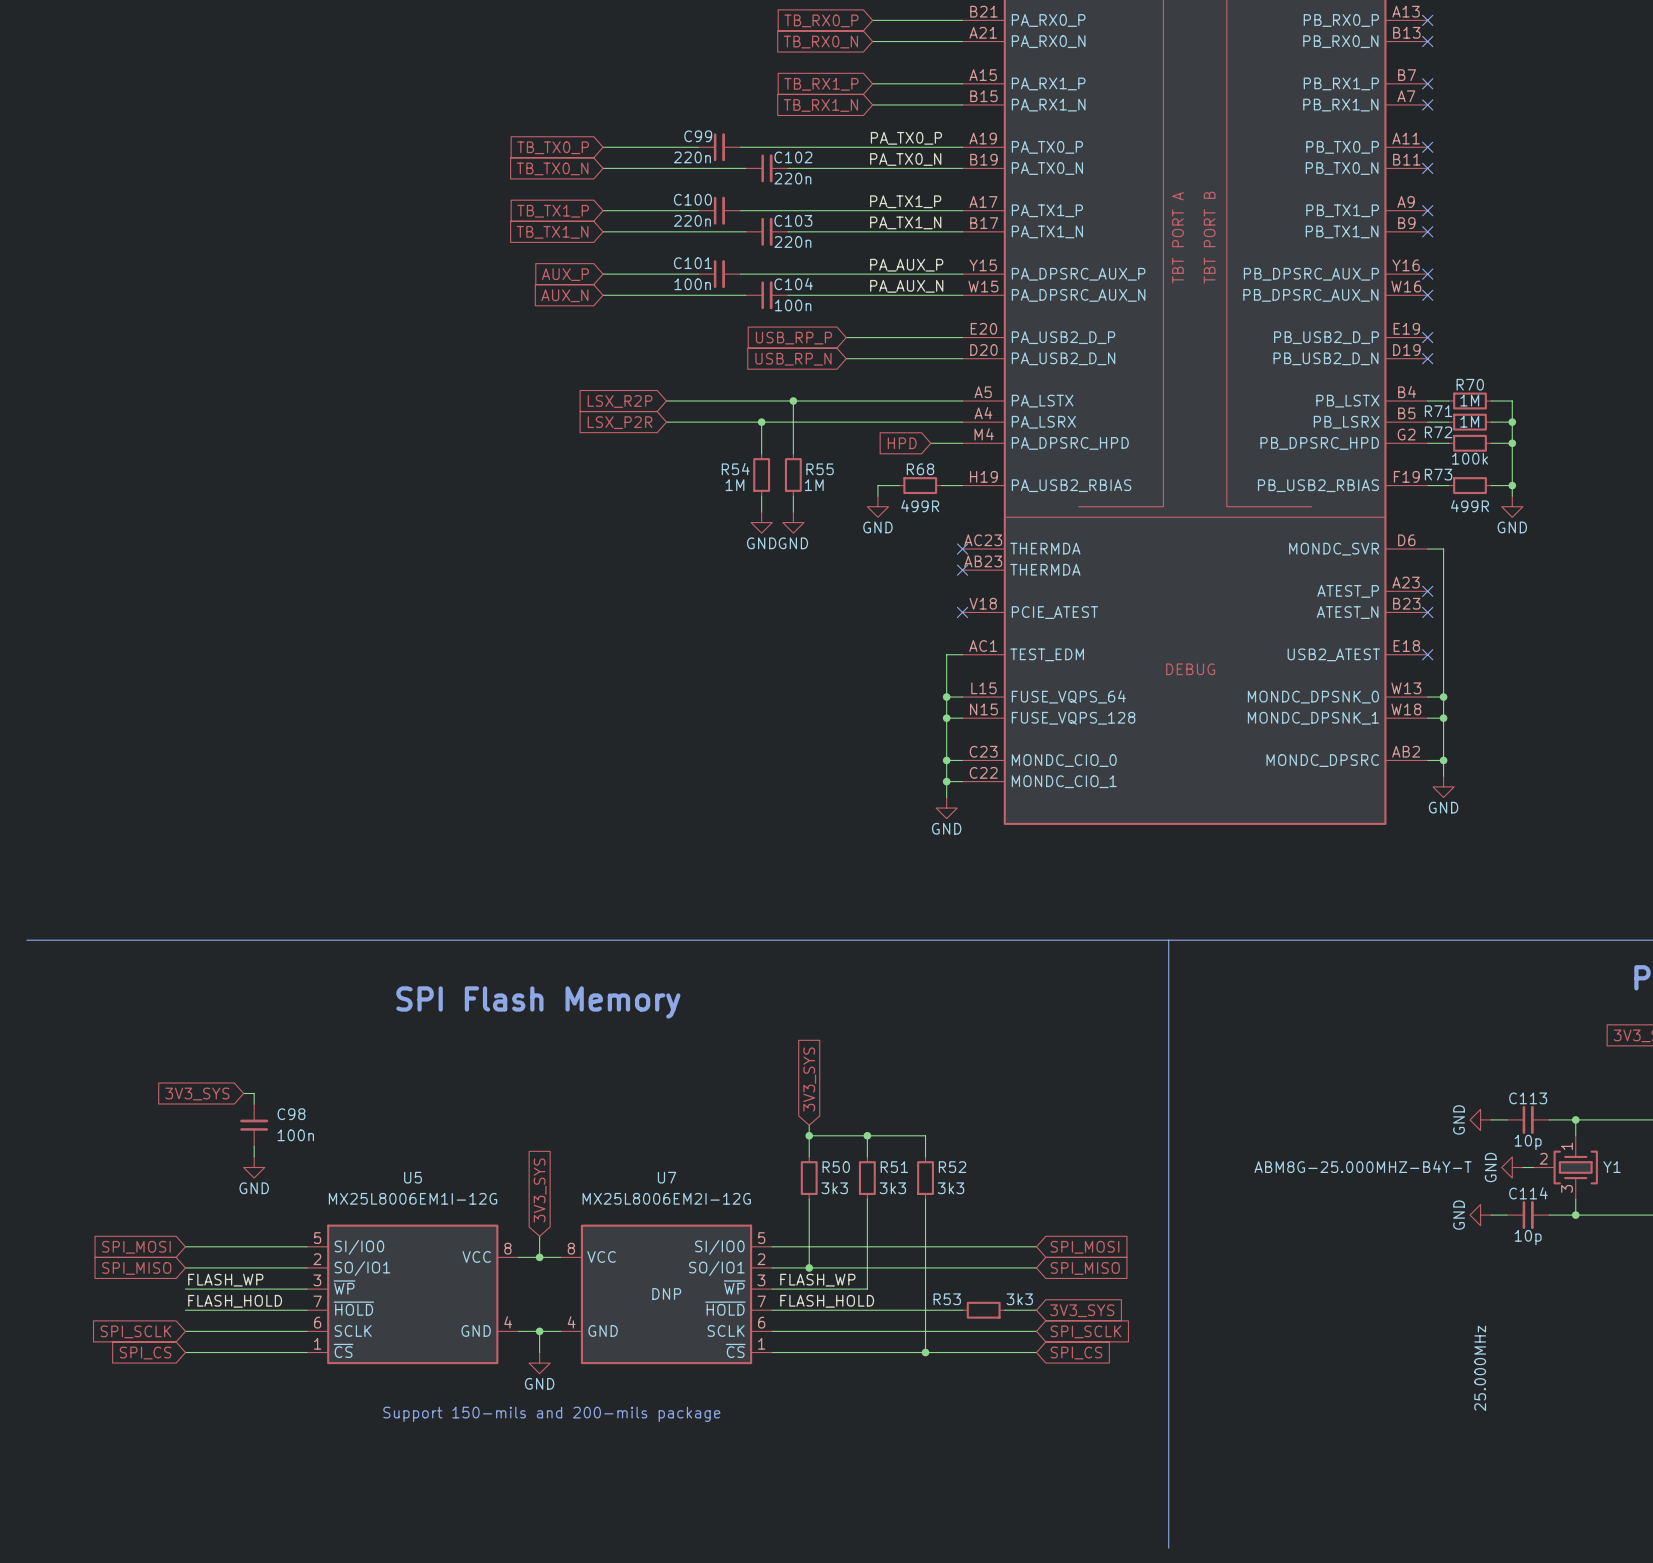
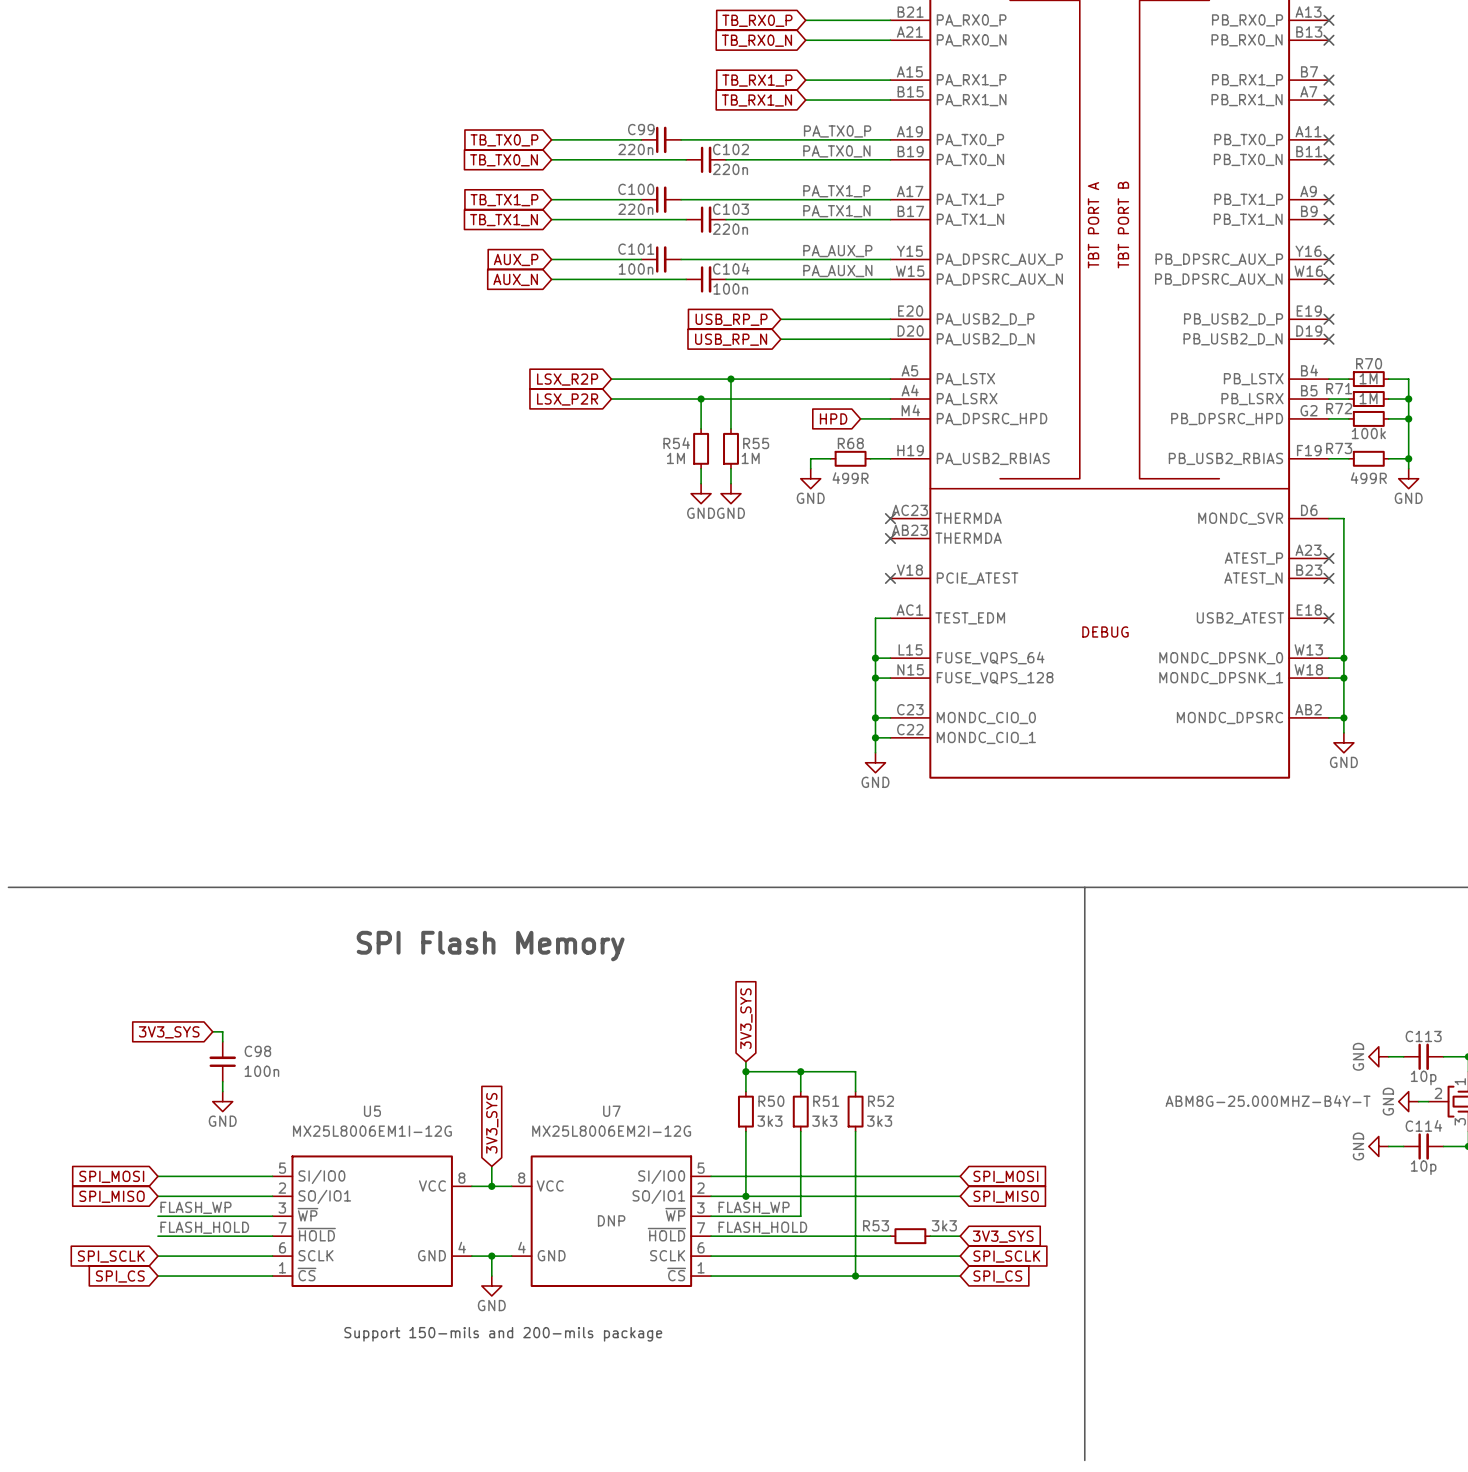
Y1 text: 25.000MHz (1480, 1368) -> none

